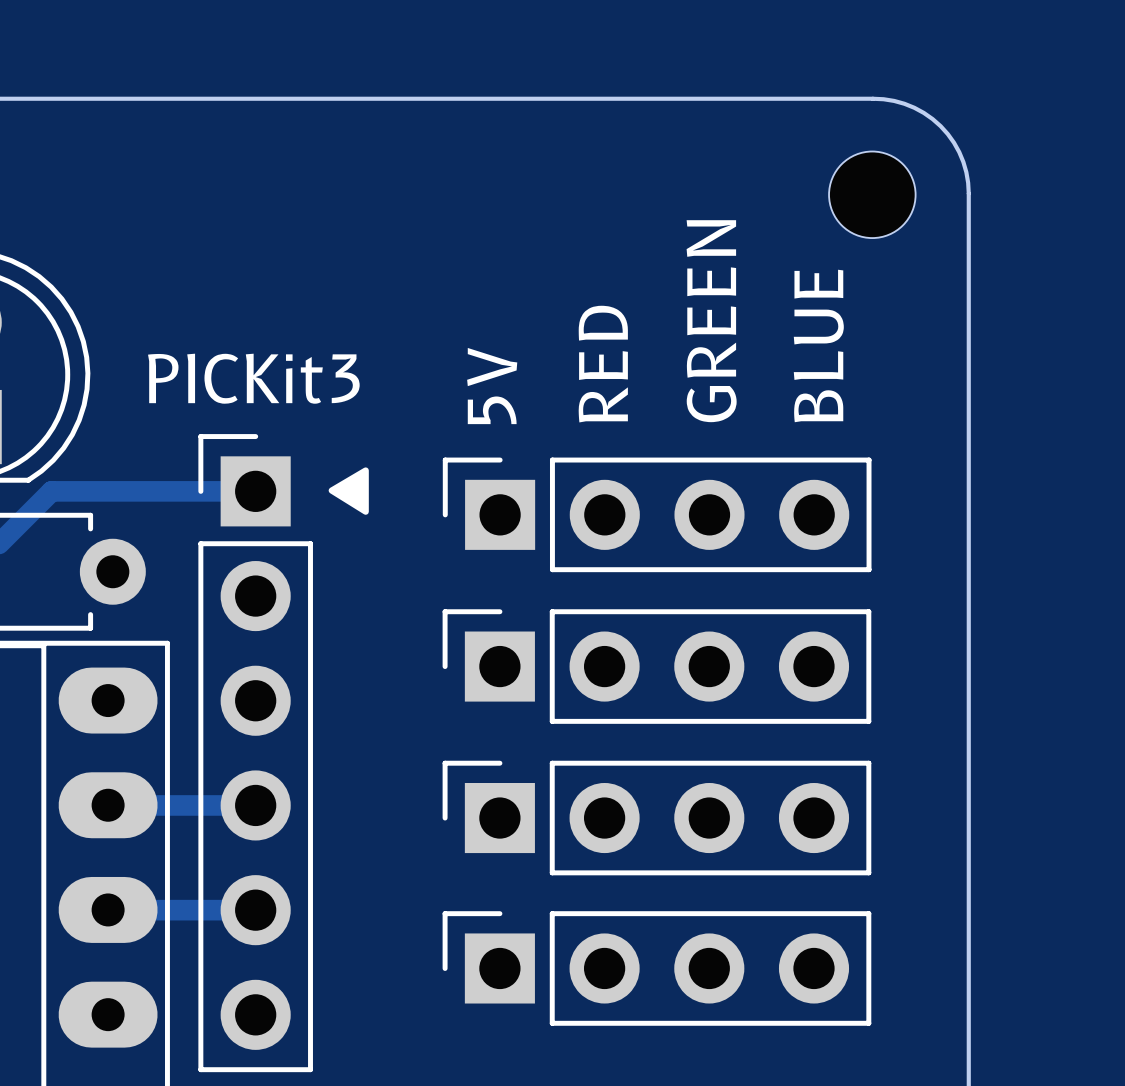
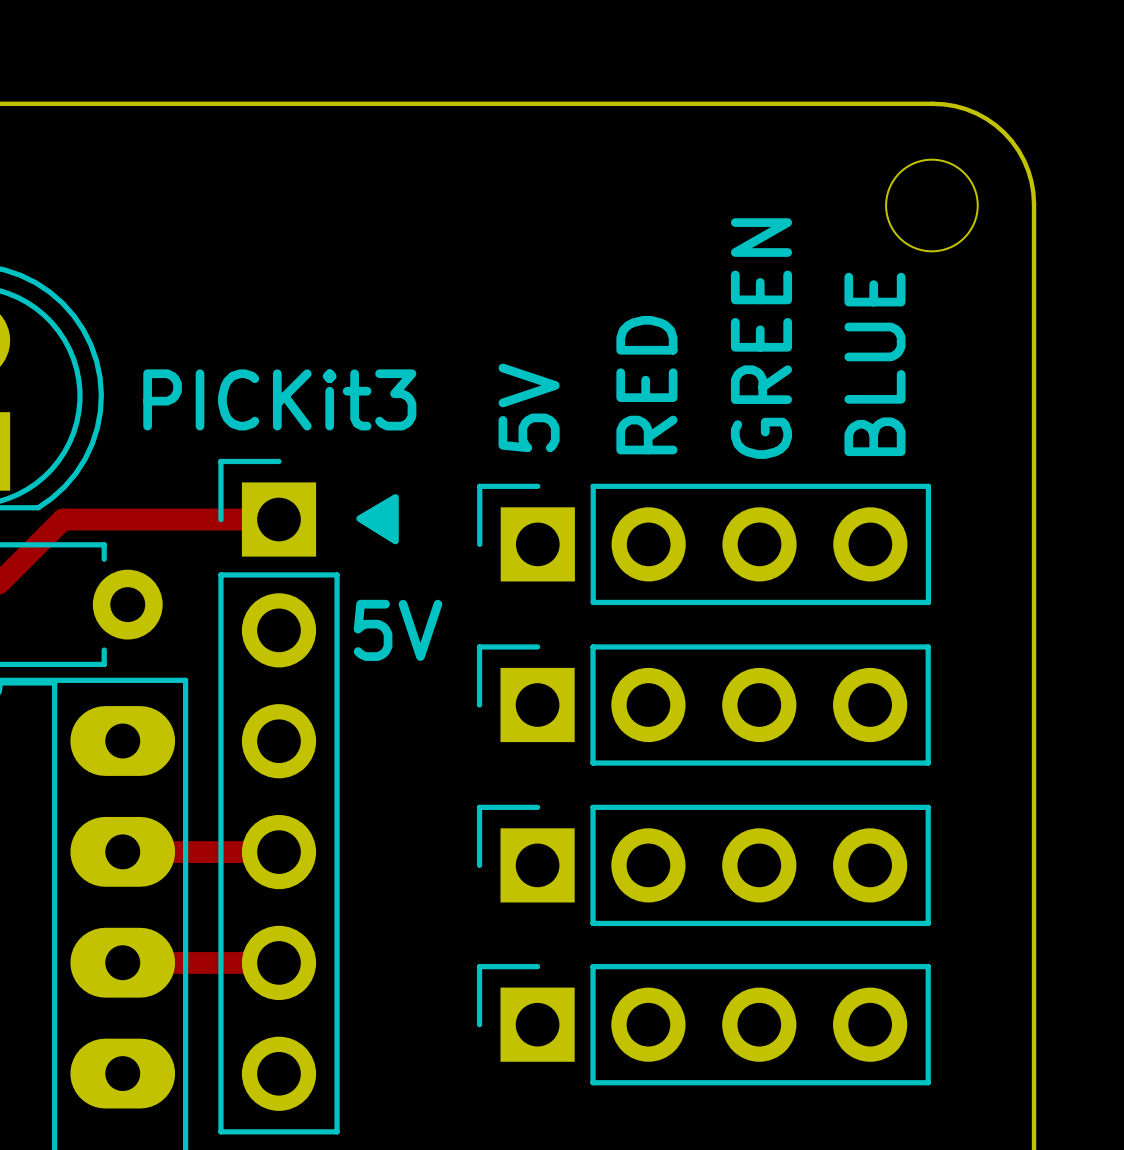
text: none -> 5V (398, 630)

